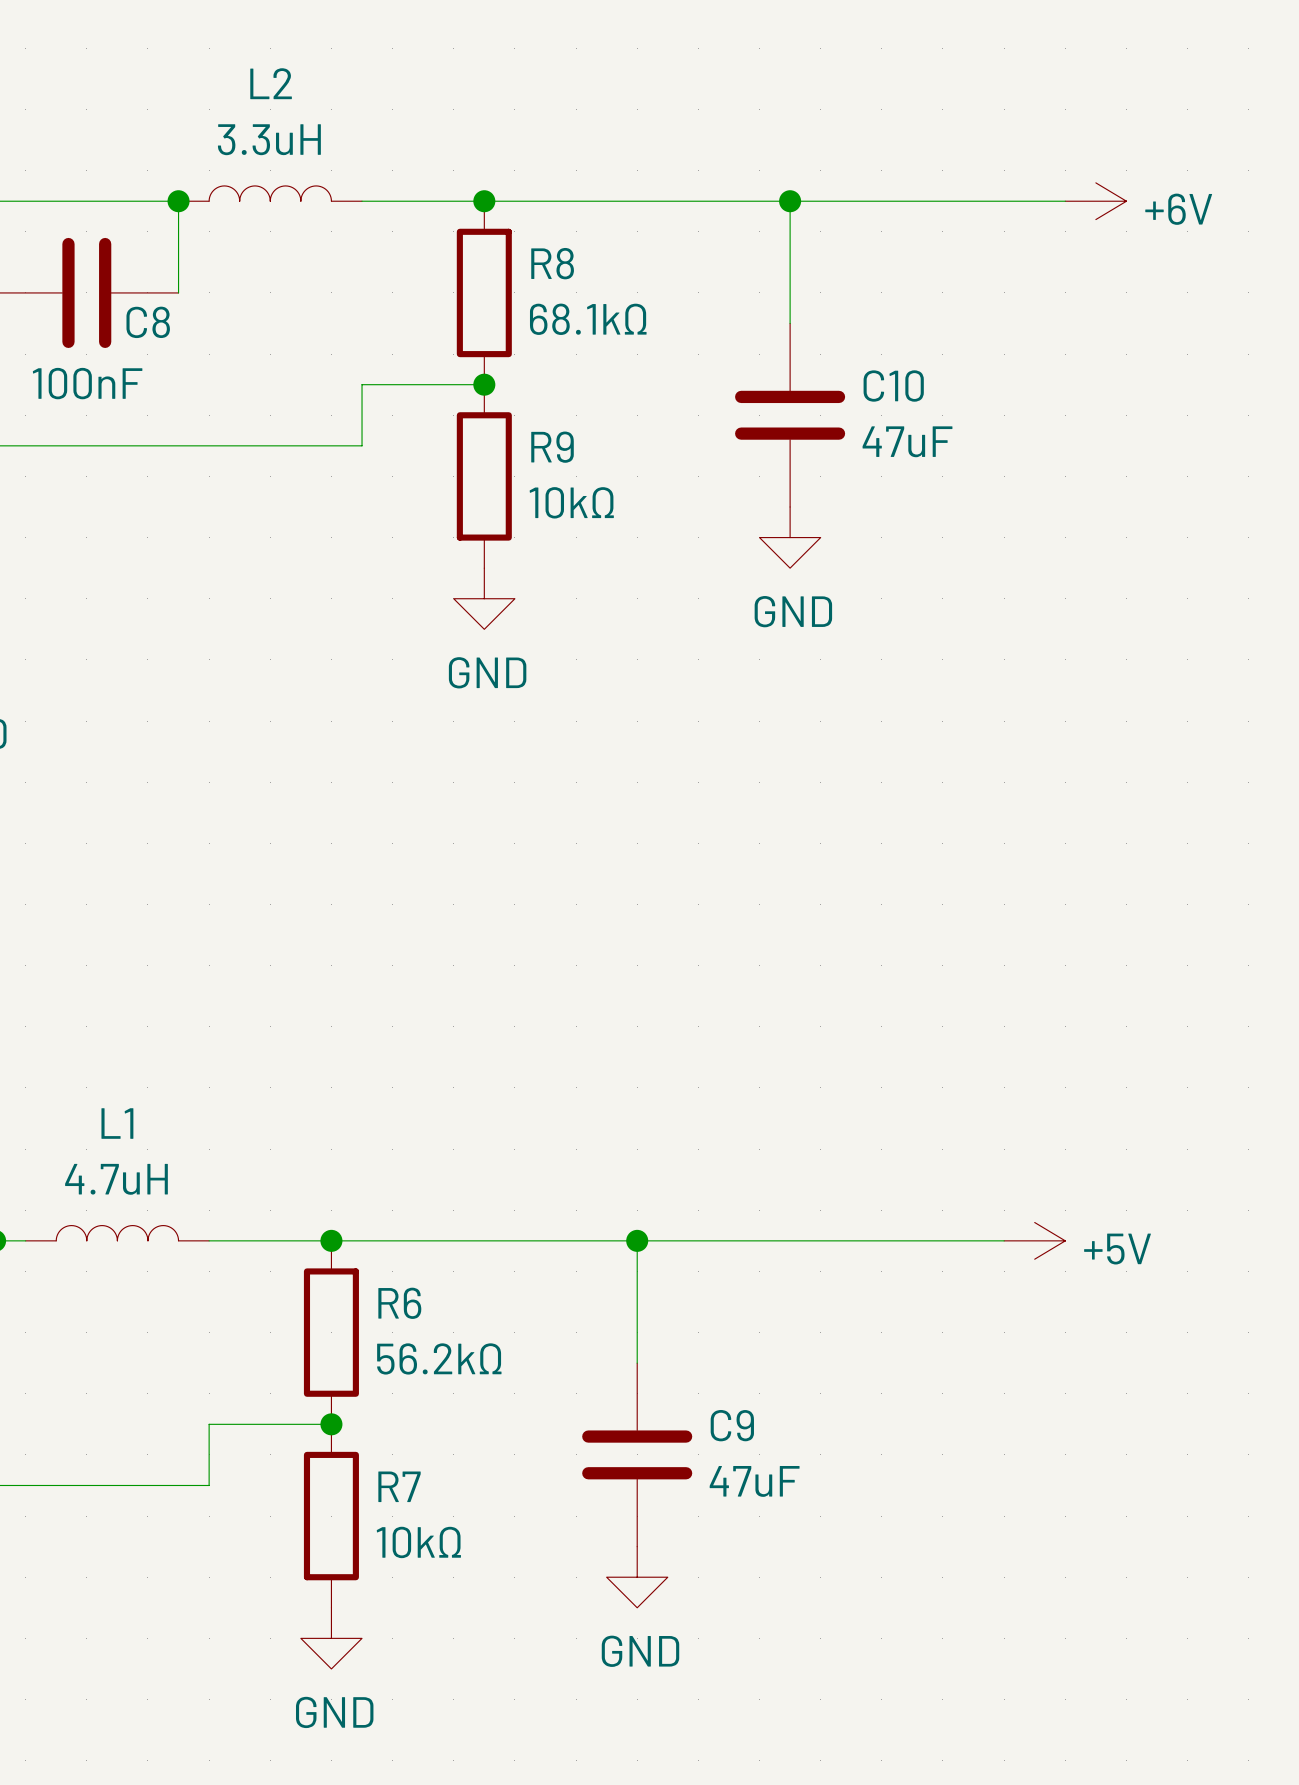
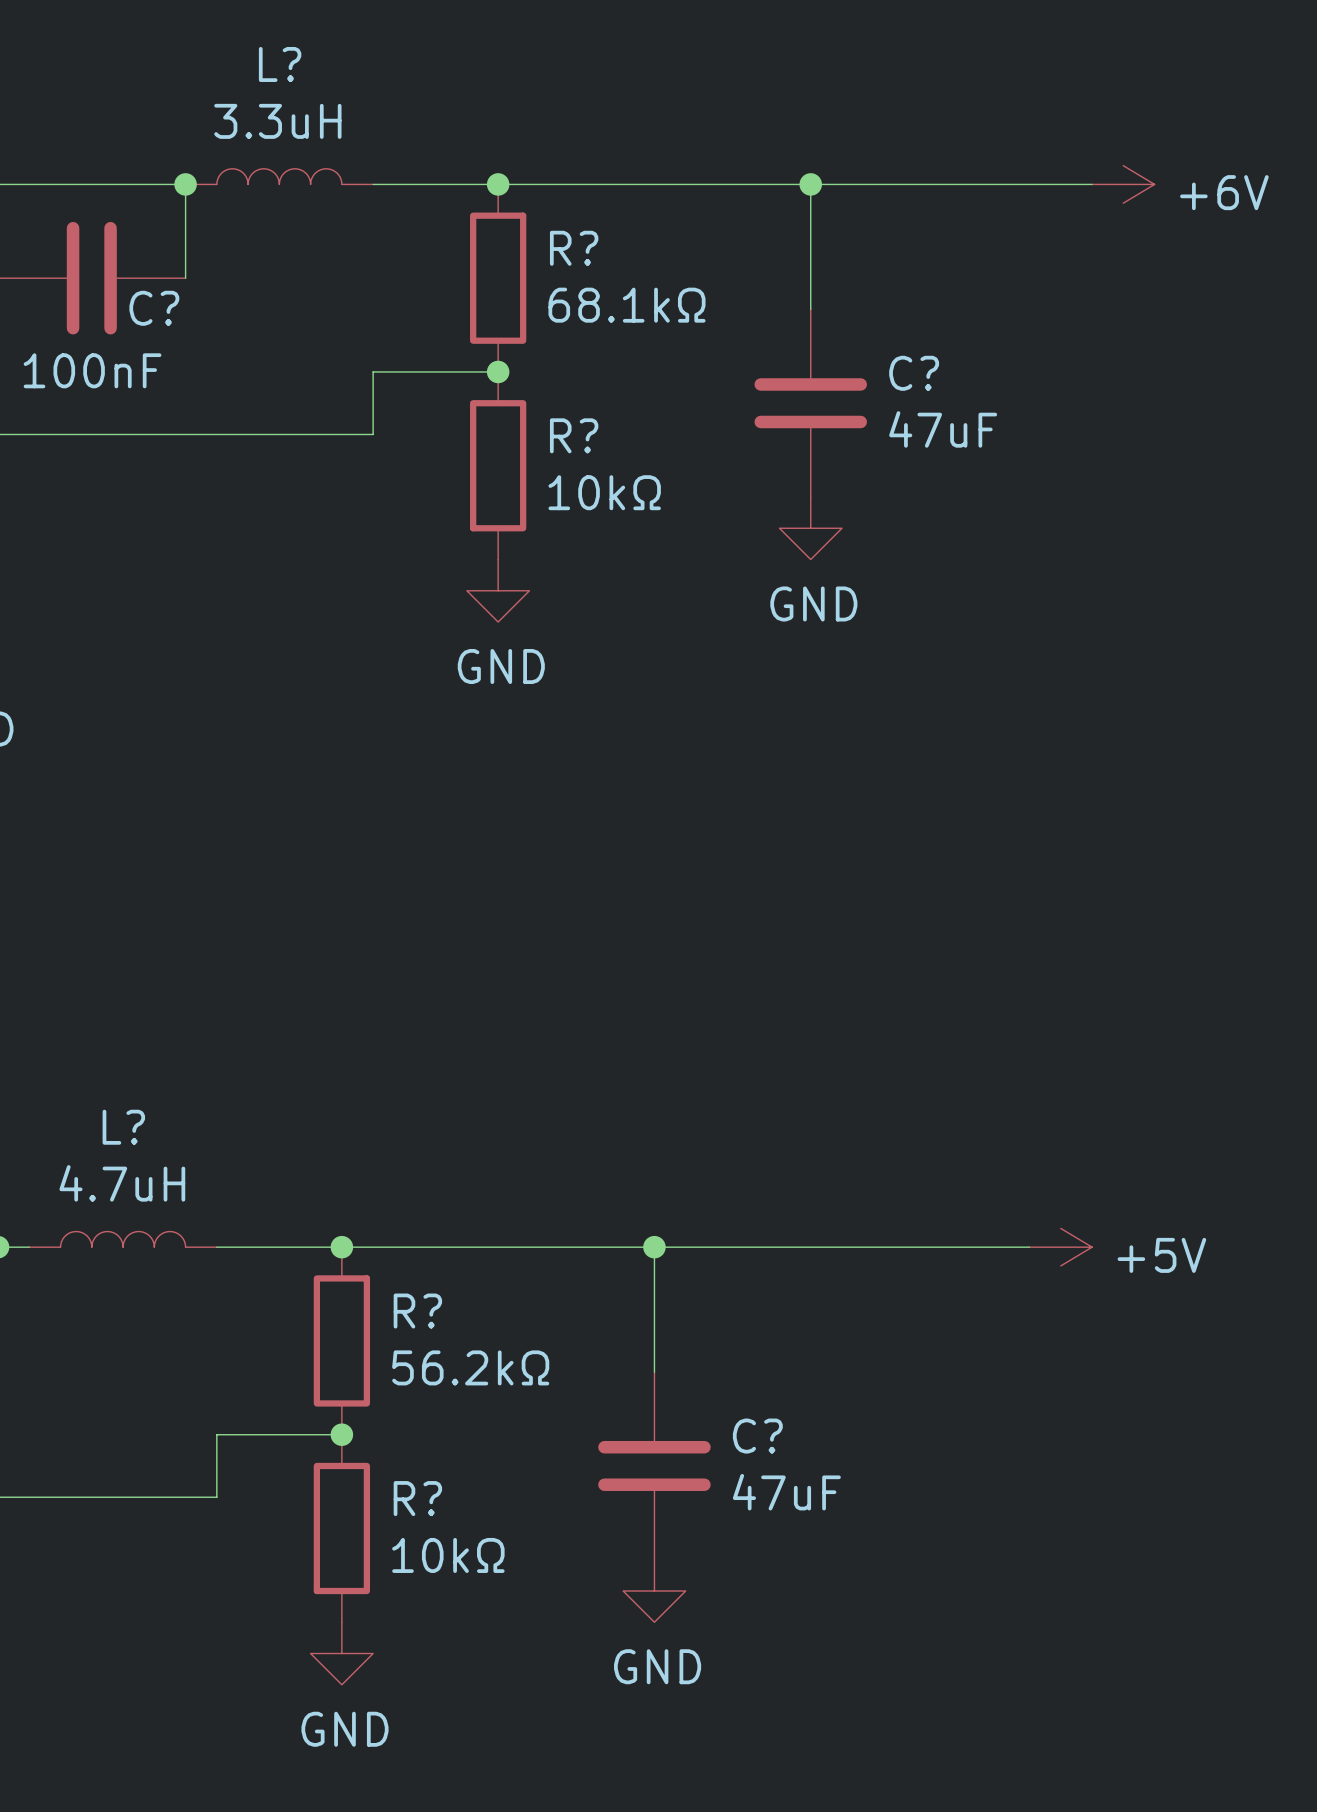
L2 name: L2 (271, 83) -> L? (280, 64)
R8 name: R8 (552, 263) -> R? (574, 248)
C8 name: C8 (148, 322) -> C? (154, 308)
C10 name: C10 (893, 386) -> C? (914, 373)
R9 name: R9 (552, 447) -> R? (574, 435)
L1 name: L1 (117, 1123) -> L? (123, 1127)
R6 name: R6 (399, 1303) -> R? (417, 1311)
C9 name: C9 (732, 1425) -> C? (757, 1436)
R7 name: R7 (399, 1486) -> R? (417, 1498)

